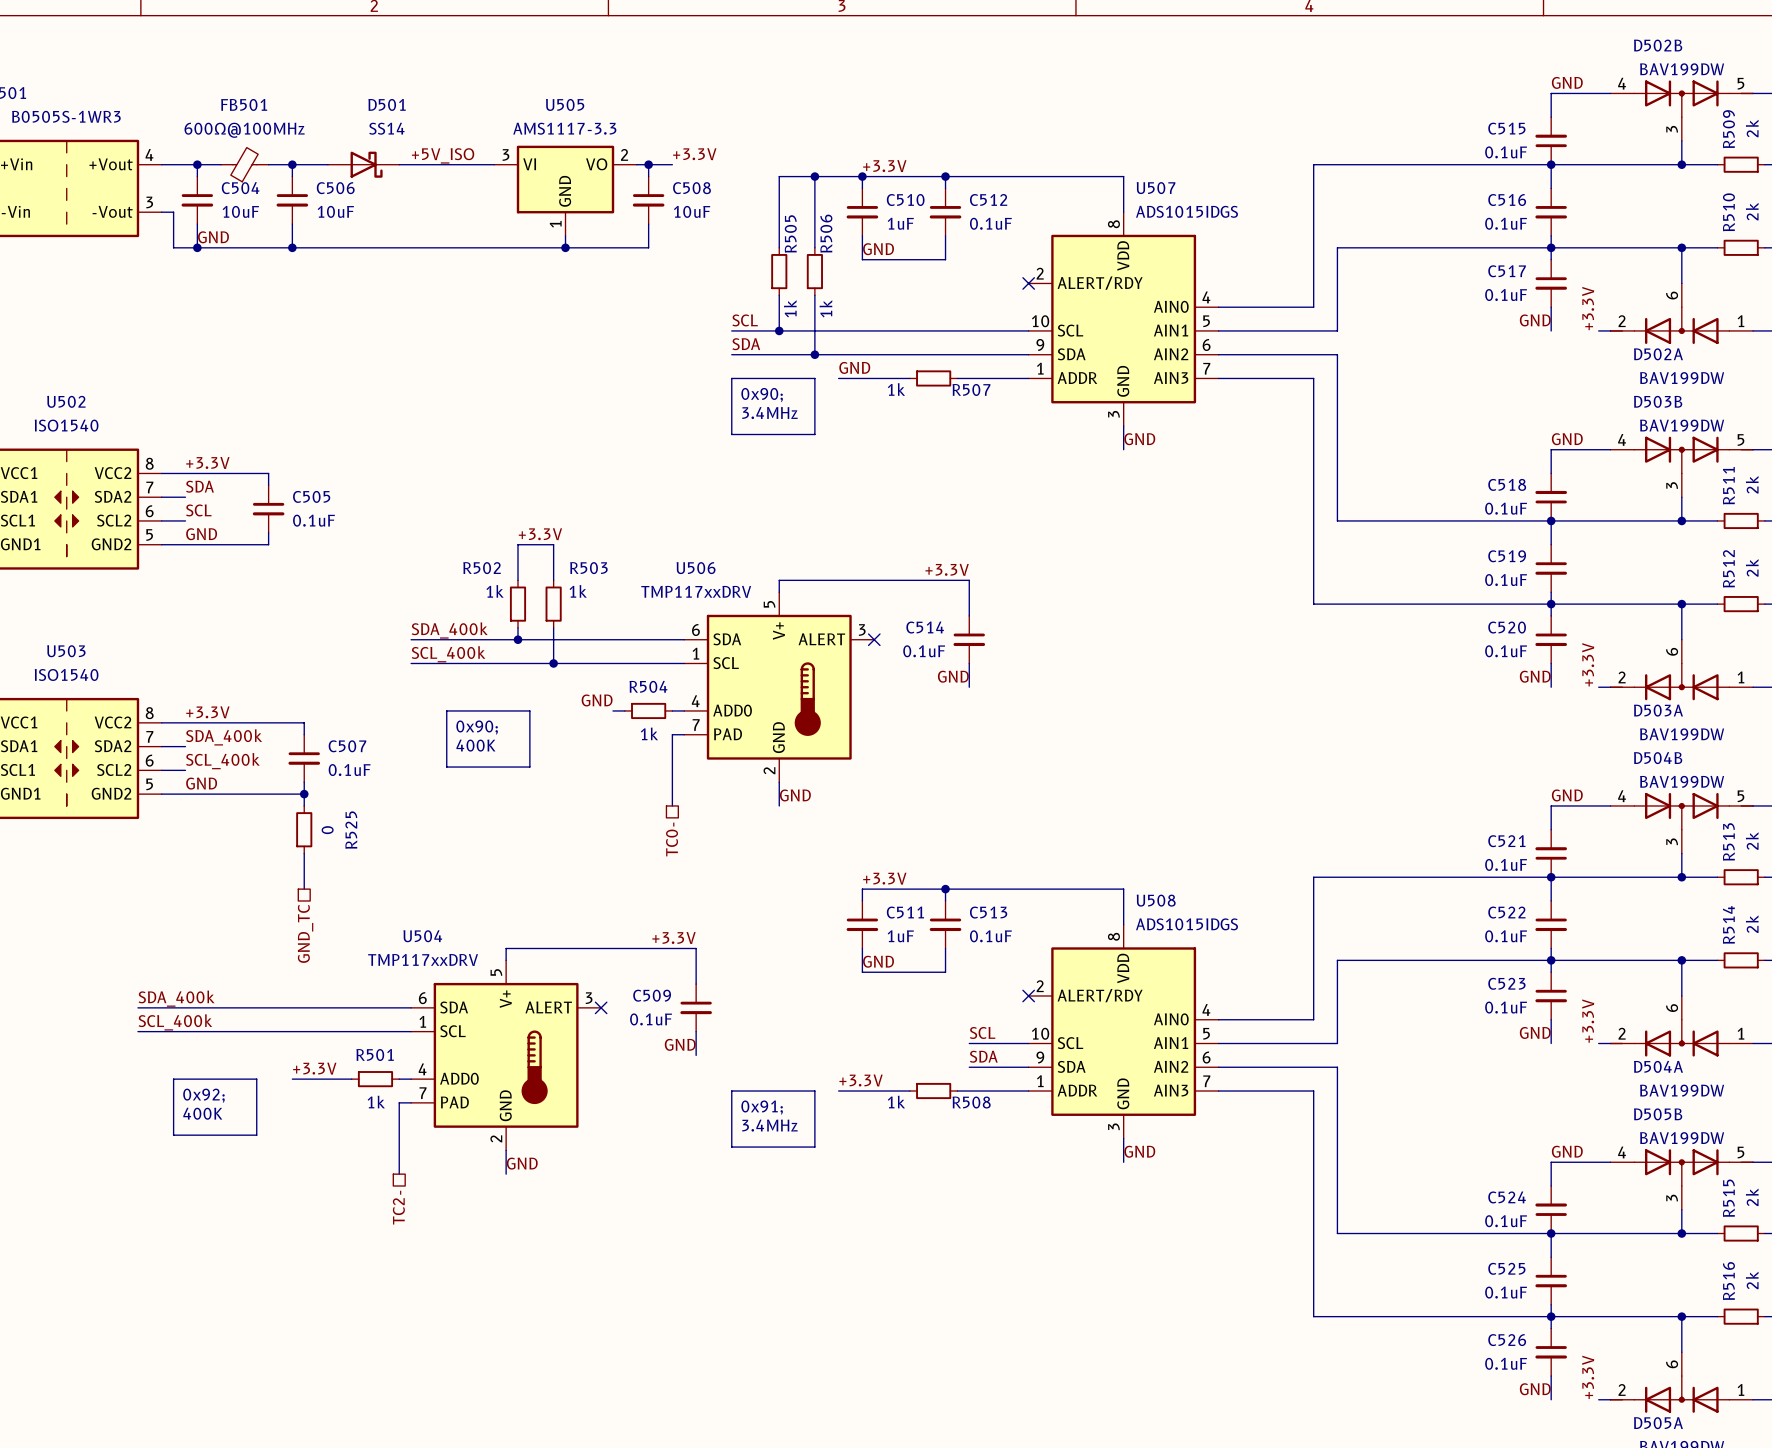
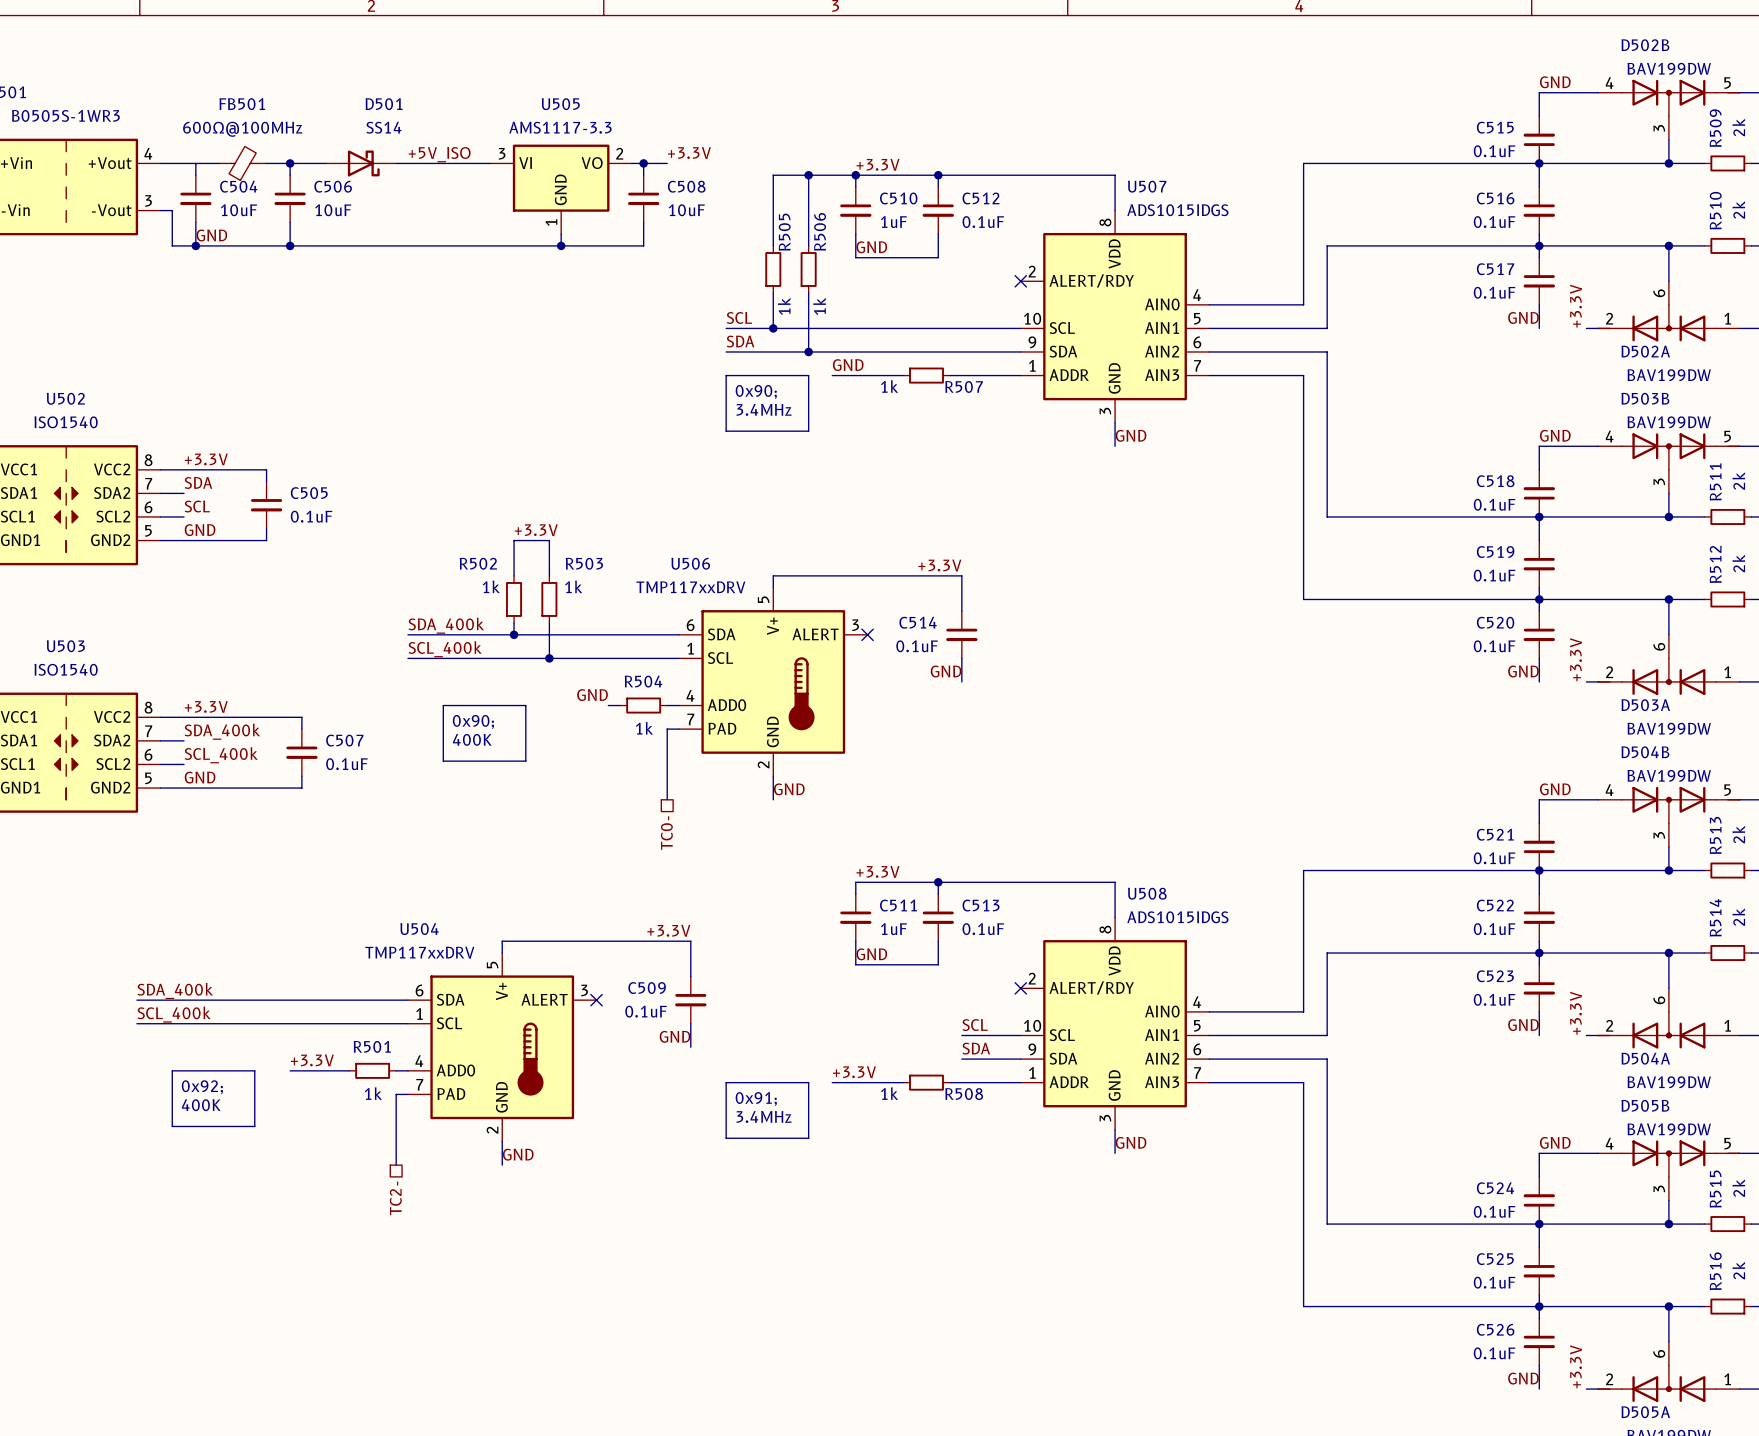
junction: (197, 164) -> none
wire: (304, 794) (304, 805) -> none
junction: (304, 794) -> none
R525: 0 (304, 829) -> none
wire: (304, 853) (304, 889) -> none
hierarchical label: GND_TC (305, 933) -> none

